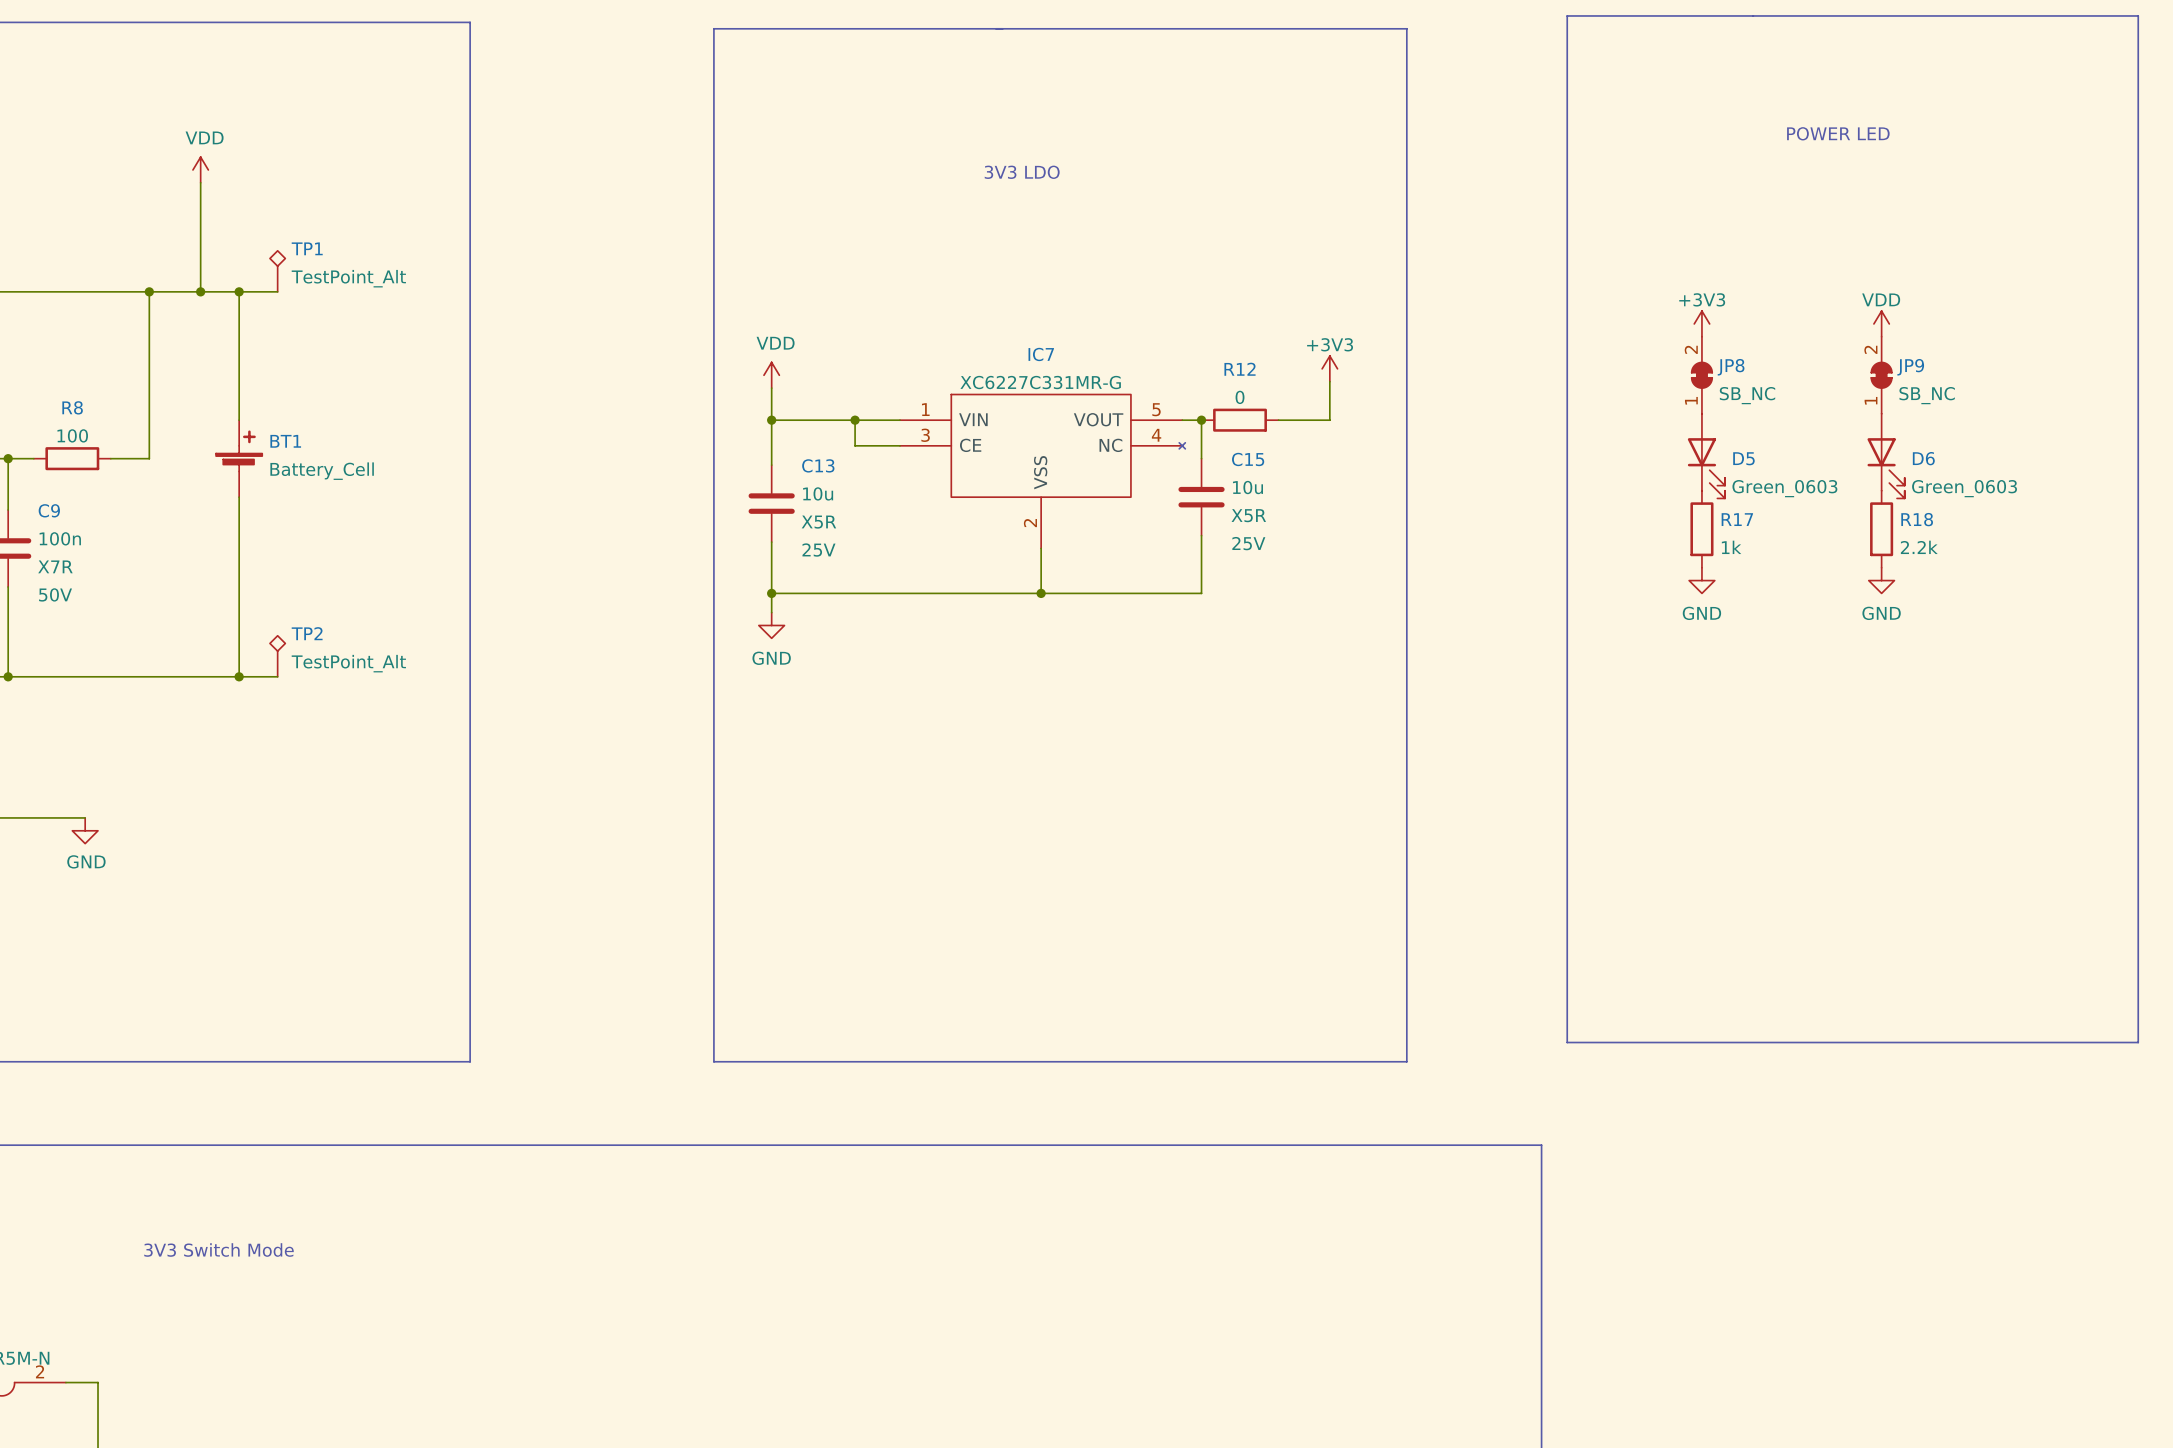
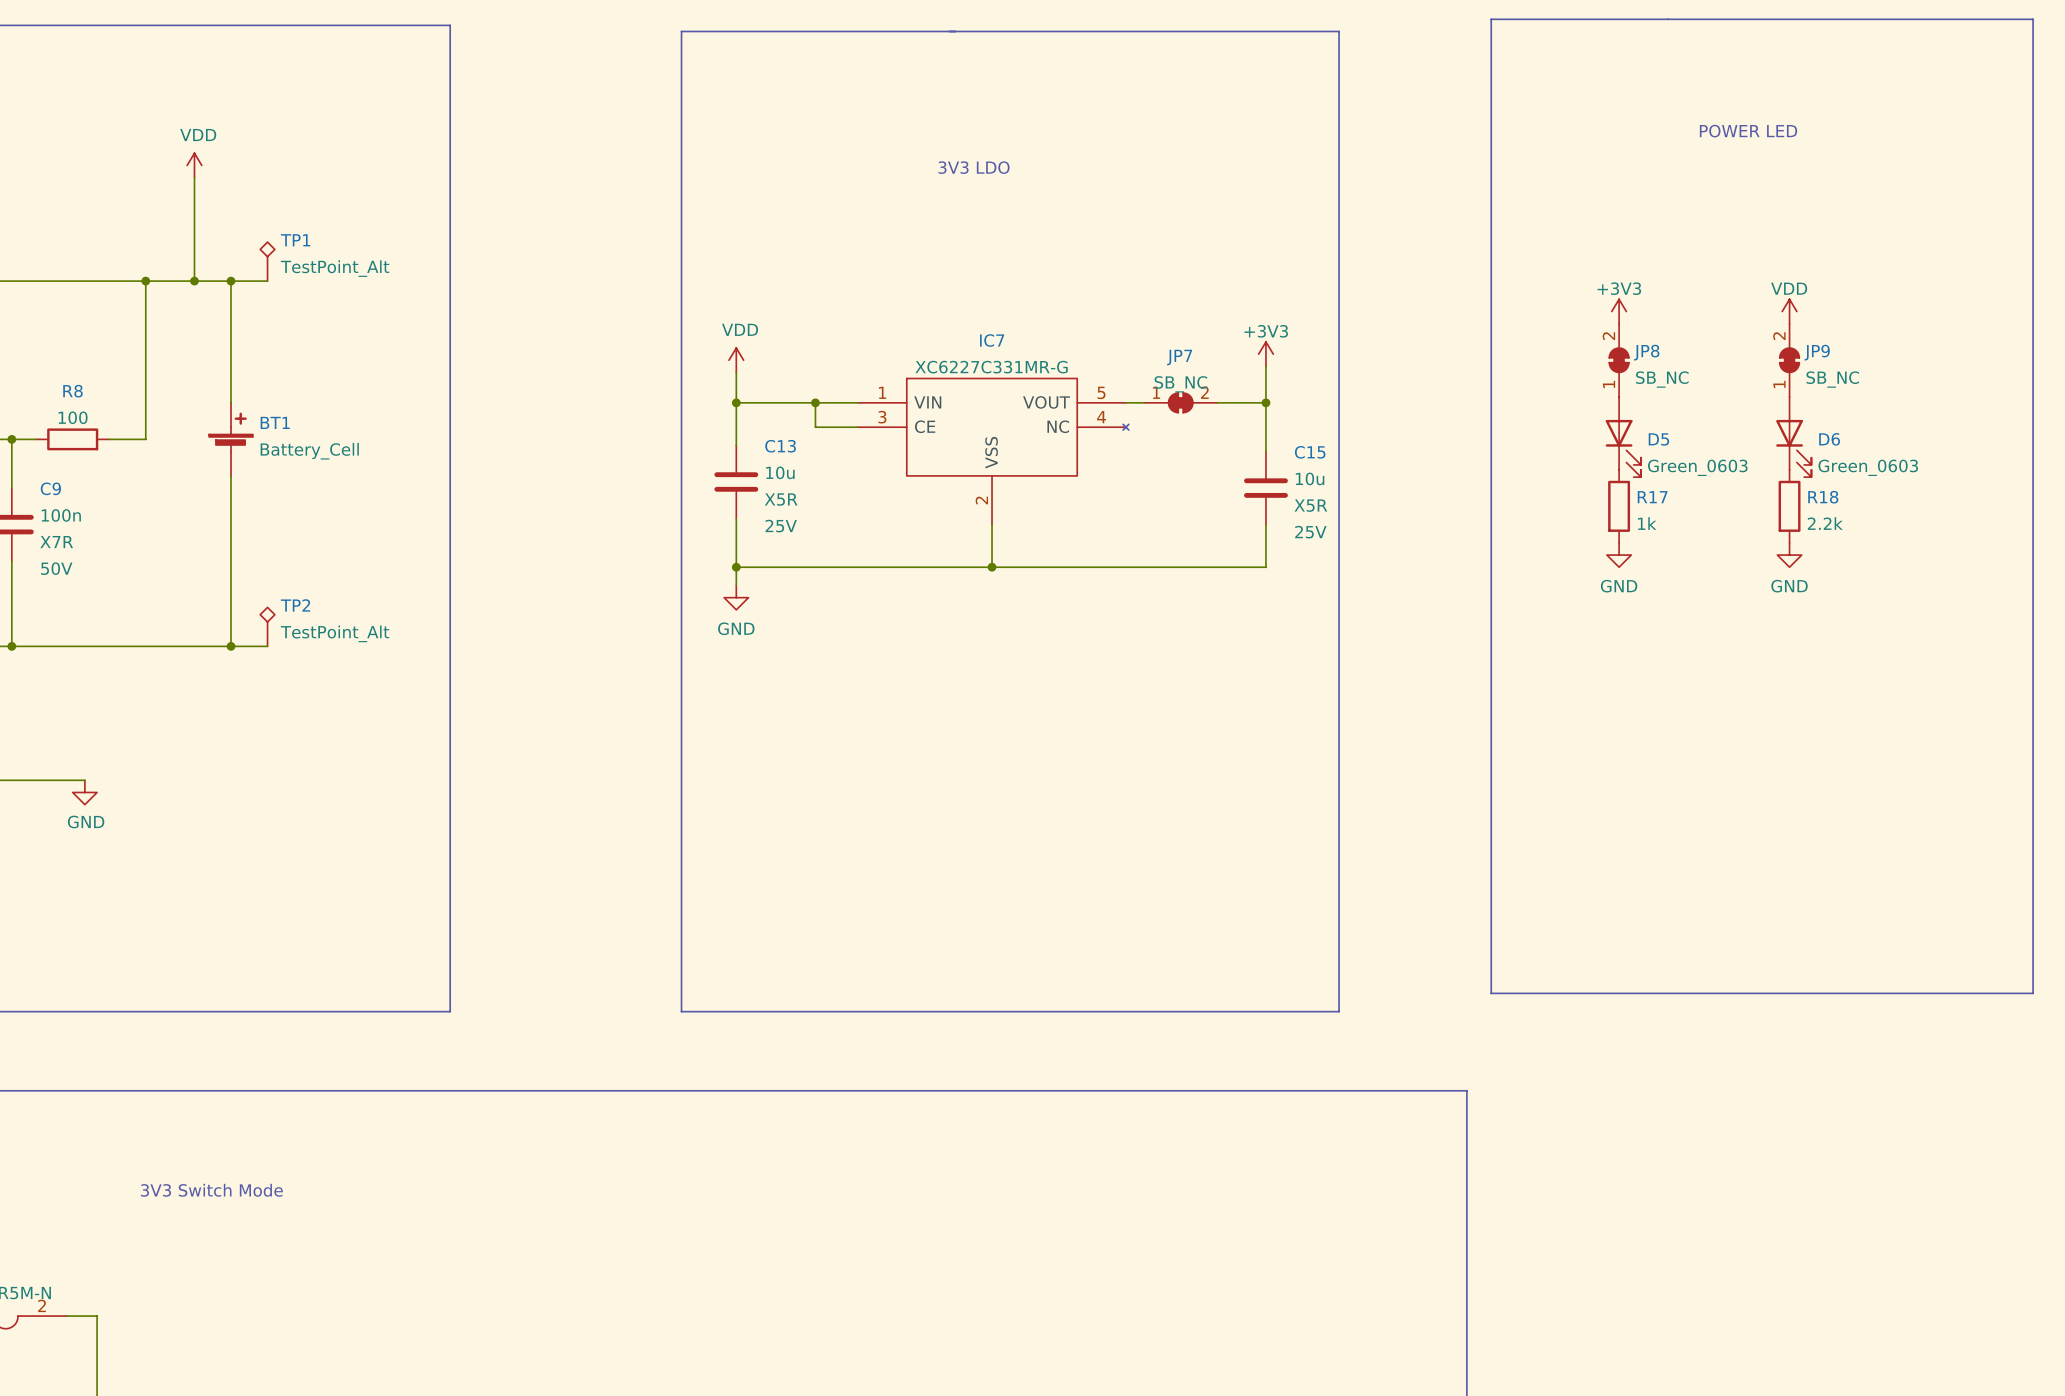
wire: (1201, 420) (1201, 458) -> none
junction: (1201, 420) -> none
R12: 0 (1240, 420) -> none
JP7: none -> SB_NC (1180, 402)
wire: none -> (1265, 402) (1265, 451)
junction: none -> (1265, 402)
C15 position: (1201, 497) -> (1265, 488)
wire: (1201, 535) (1201, 593) -> (1265, 524) (1265, 567) (1144, 567)

